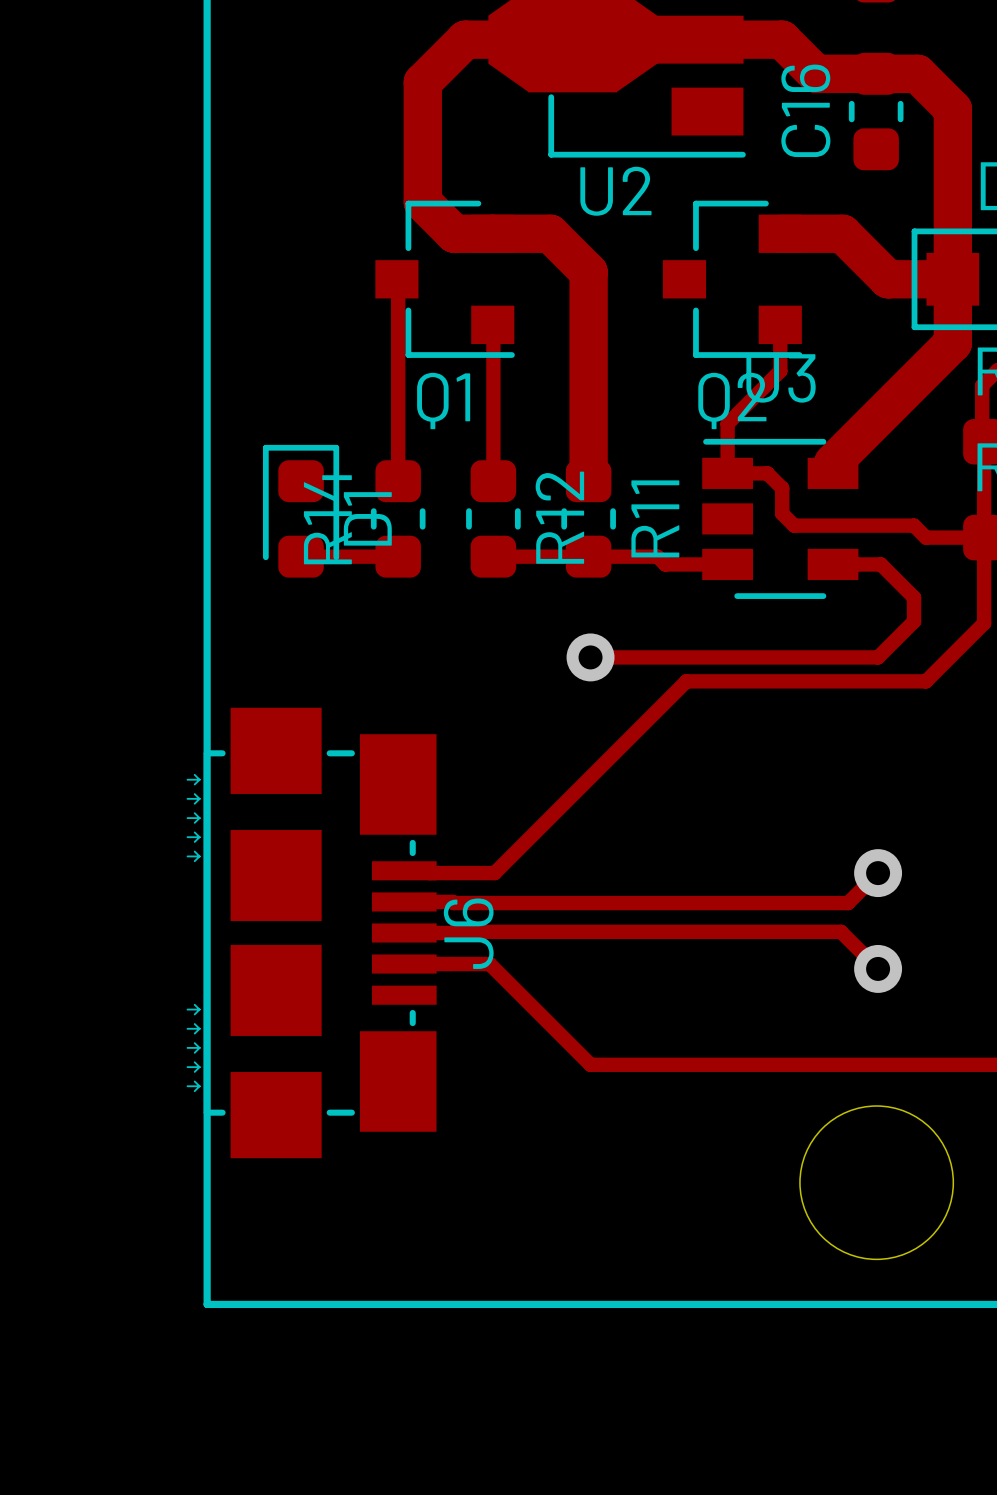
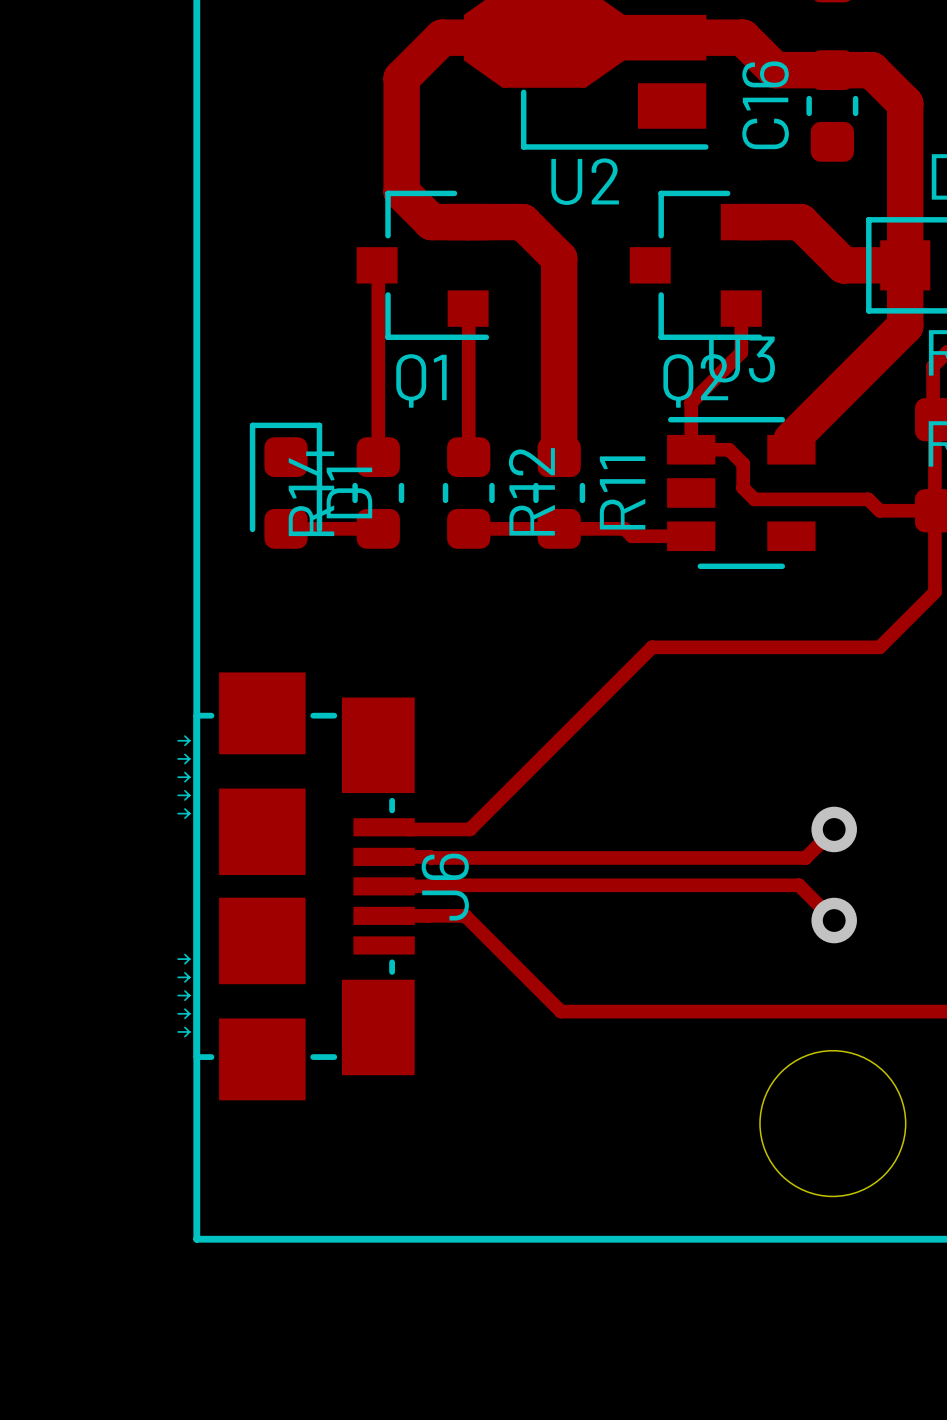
track: (833, 564) (880, 564) (914, 597) (914, 621) (878, 657) (590, 657) -> none
via: (590, 657) -> none

